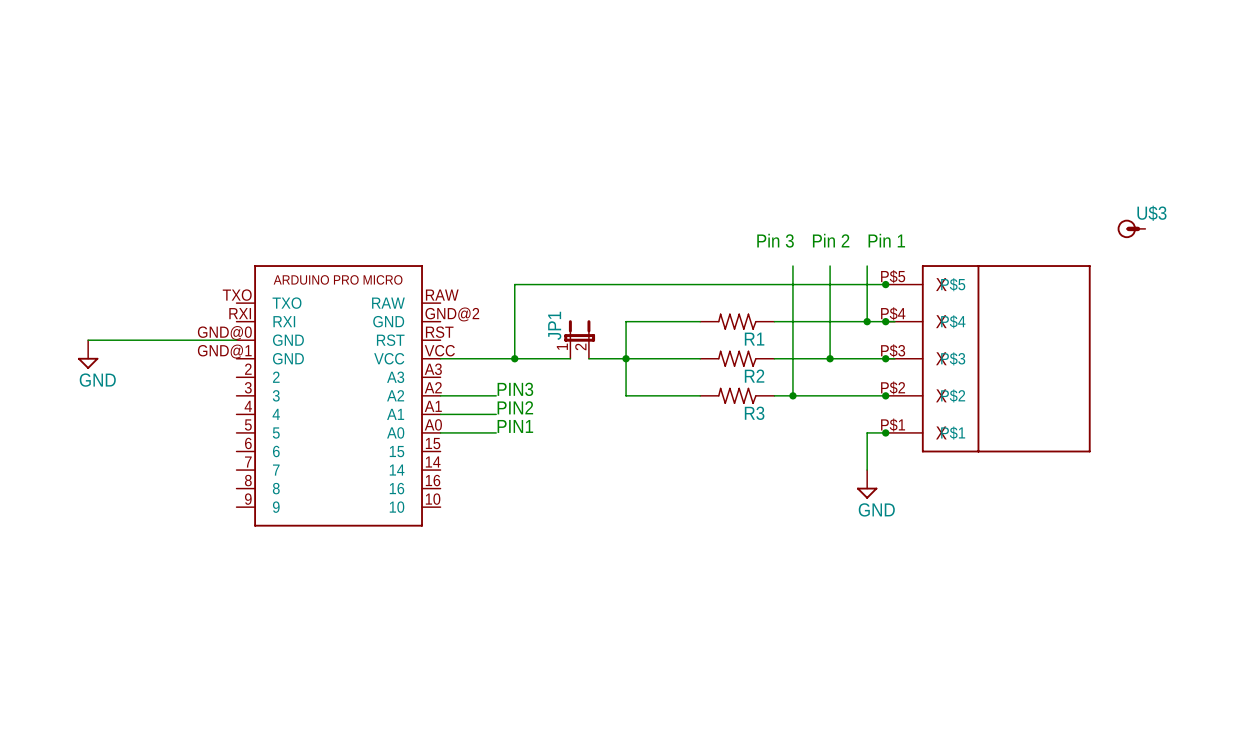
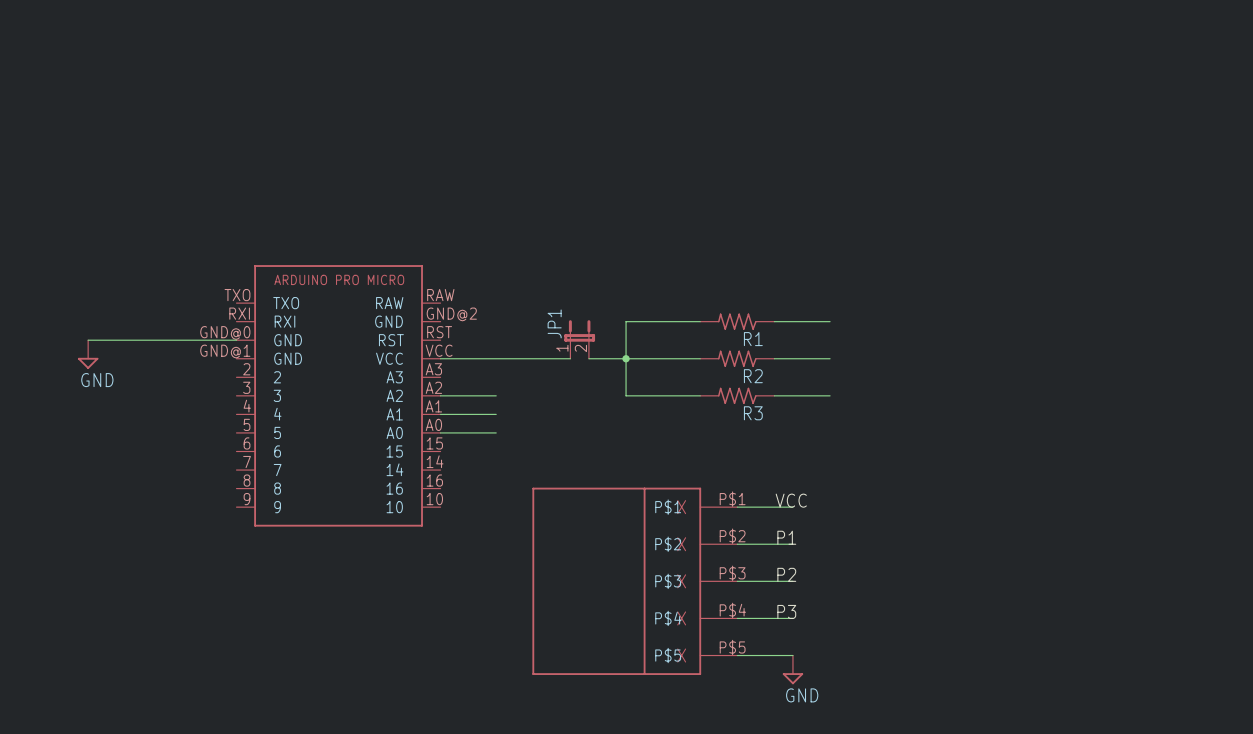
U$3: (1131, 228) -> none
text: Pin 3 (775, 240) -> none
text: Pin 2 (831, 240) -> none
text: Pin 1 (886, 240) -> none
wire: (792, 266) (792, 395) -> none
wire: (830, 266) (830, 358) (894, 358) -> none
wire: (867, 266) (867, 321) -> none
wire: (885, 284) (514, 284) (514, 358) -> none
junction: (885, 284) -> none
wire: (830, 321) (894, 321) -> none
junction: (867, 321) -> none
junction: (885, 321) -> none
junction: (514, 358) -> none
junction: (830, 358) -> none
junction: (885, 358) -> none
part: (988, 358) -> none
text: PIN3 (515, 389) -> none
junction: (792, 395) -> none
wire: (830, 395) (885, 395) -> (737, 507) (792, 507)
junction: (885, 395) -> none
text: PIN2 (515, 407) -> none
text: PIN1 (515, 426) -> none
wire: (885, 432) (867, 432) (867, 470) -> none
junction: (885, 432) -> none
power symbol: GND (867, 484) -> none
label: none -> VCC (791, 500)
label: none -> P1 (786, 537)
wire: none -> (737, 544) (792, 544)
label: none -> P2 (786, 574)
part: none -> (634, 581)
wire: none -> (737, 581) (792, 581)
label: none -> P3 (786, 611)
wire: none -> (737, 618) (792, 618)
wire: none -> (737, 655) (792, 655)
power symbol: none -> GND (792, 669)

